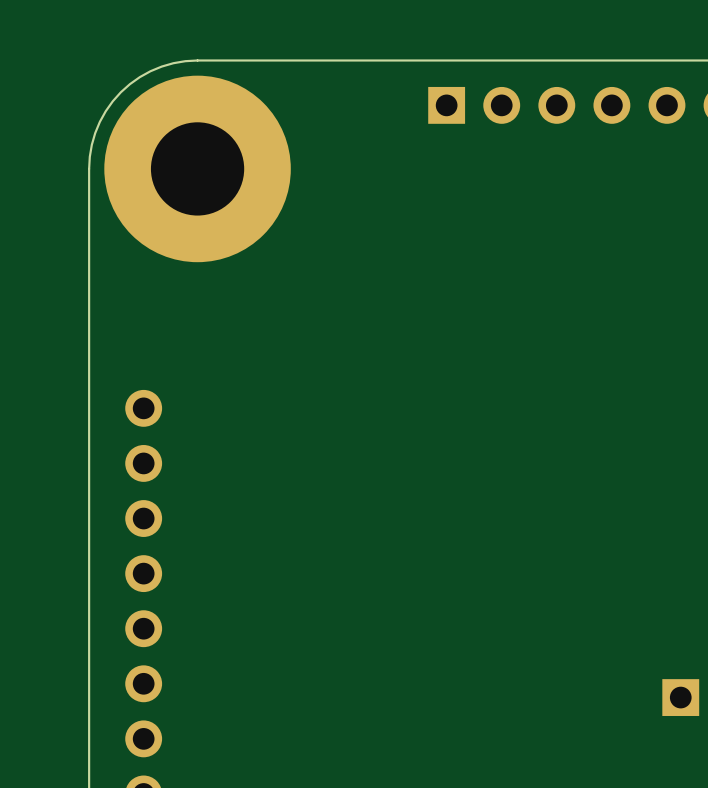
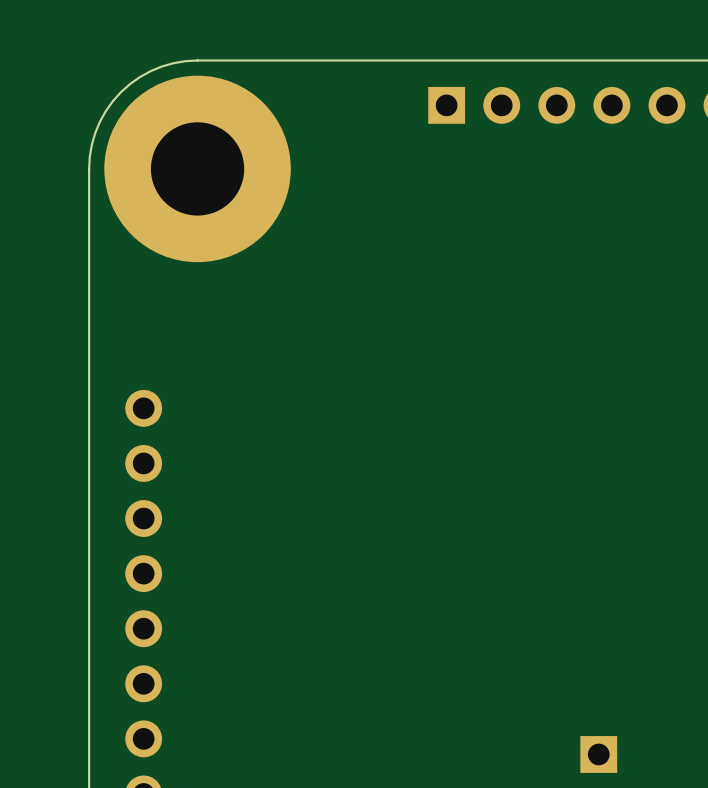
part position: (680, 697) -> (598, 754)

